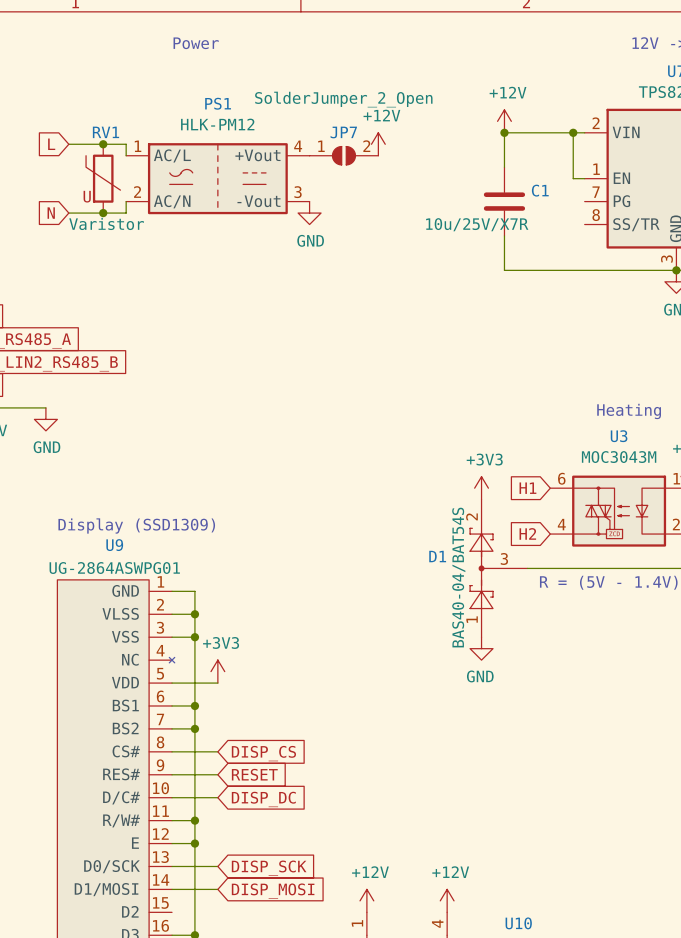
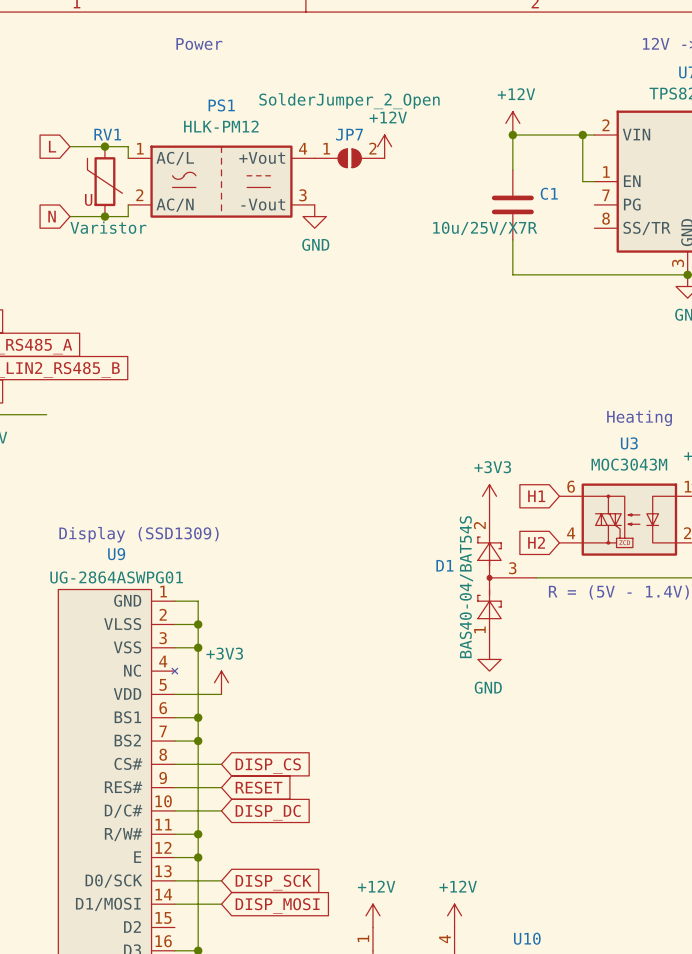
power symbol: GND (45, 419) -> none

